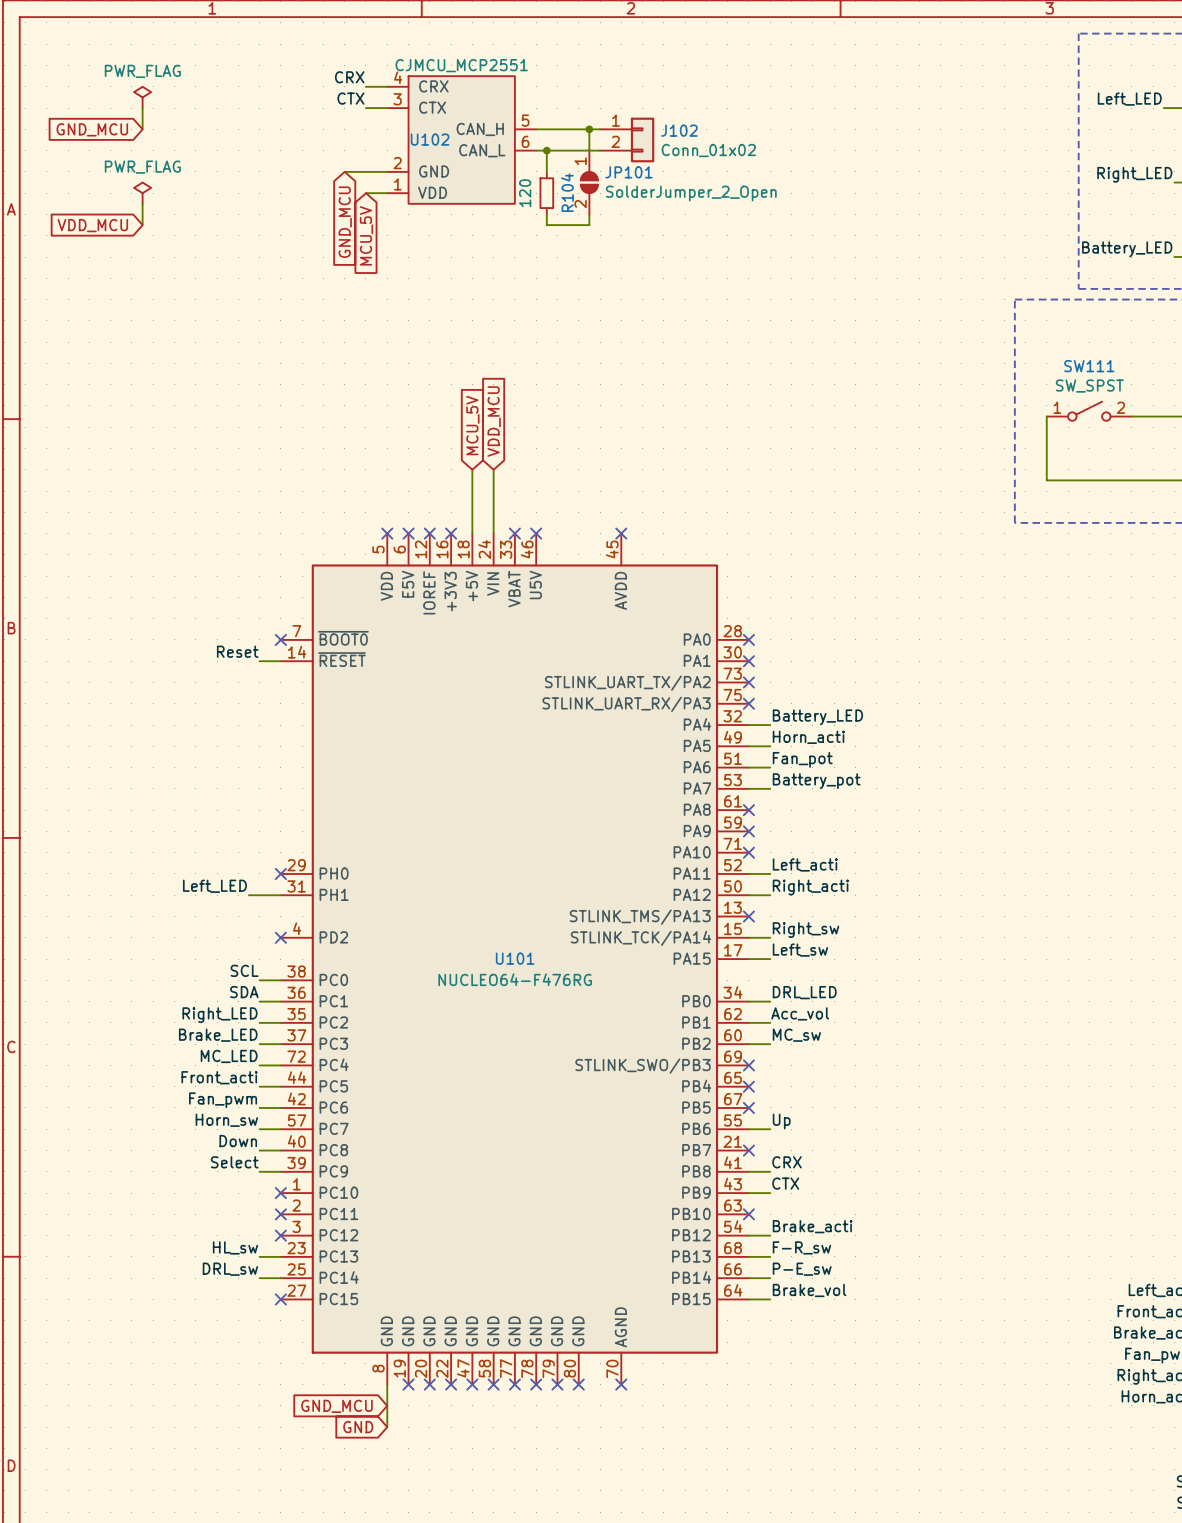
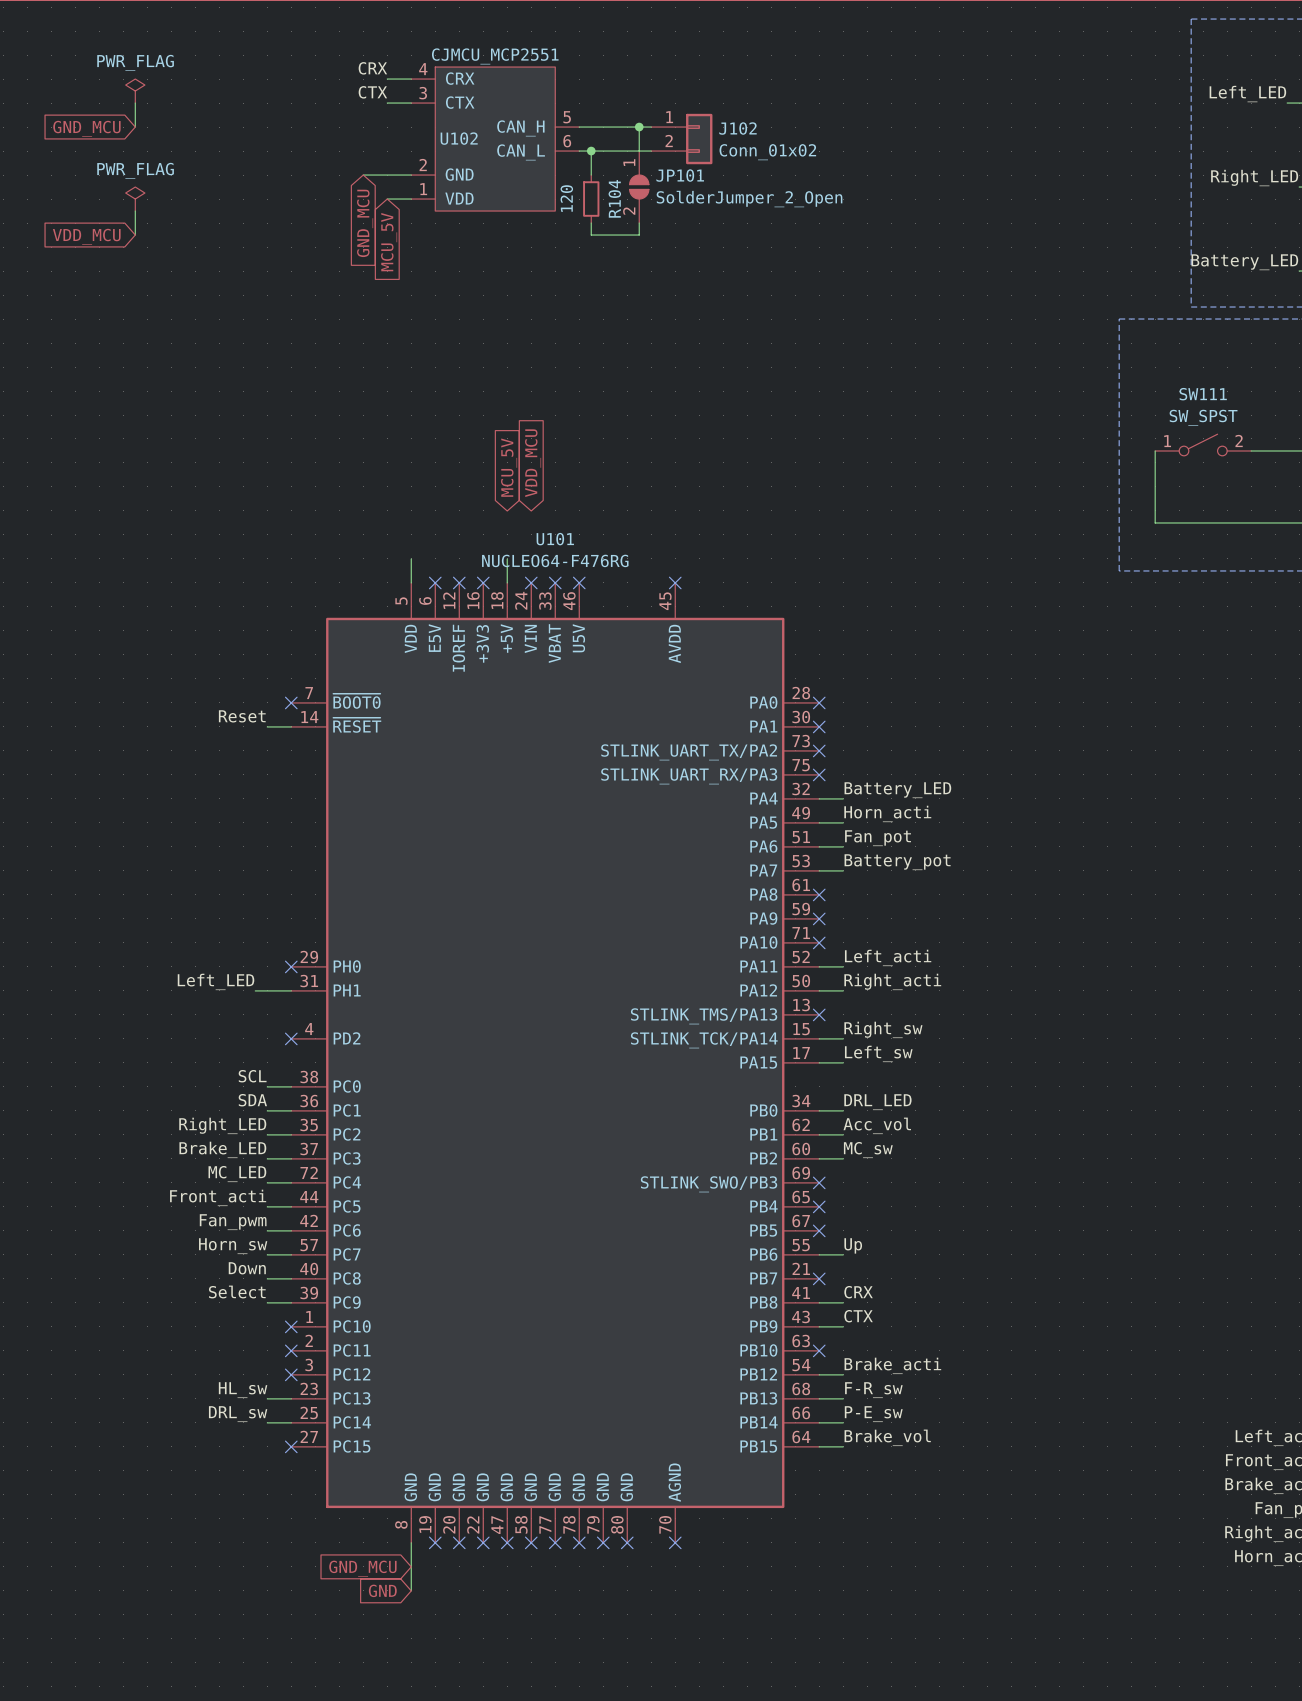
wire: (472, 469) (472, 512) -> none
wire: (493, 469) (493, 533) -> none
wire: none -> (411, 558) (411, 582)
no-connect mark: (387, 533) -> none
no-connect mark: none -> (531, 582)
U101 name position: U101 (515, 958) -> U101 (555, 539)
U101 value position: NUCLEO64-F476RG (515, 979) -> NUCLEO64-F476RG (555, 560)

